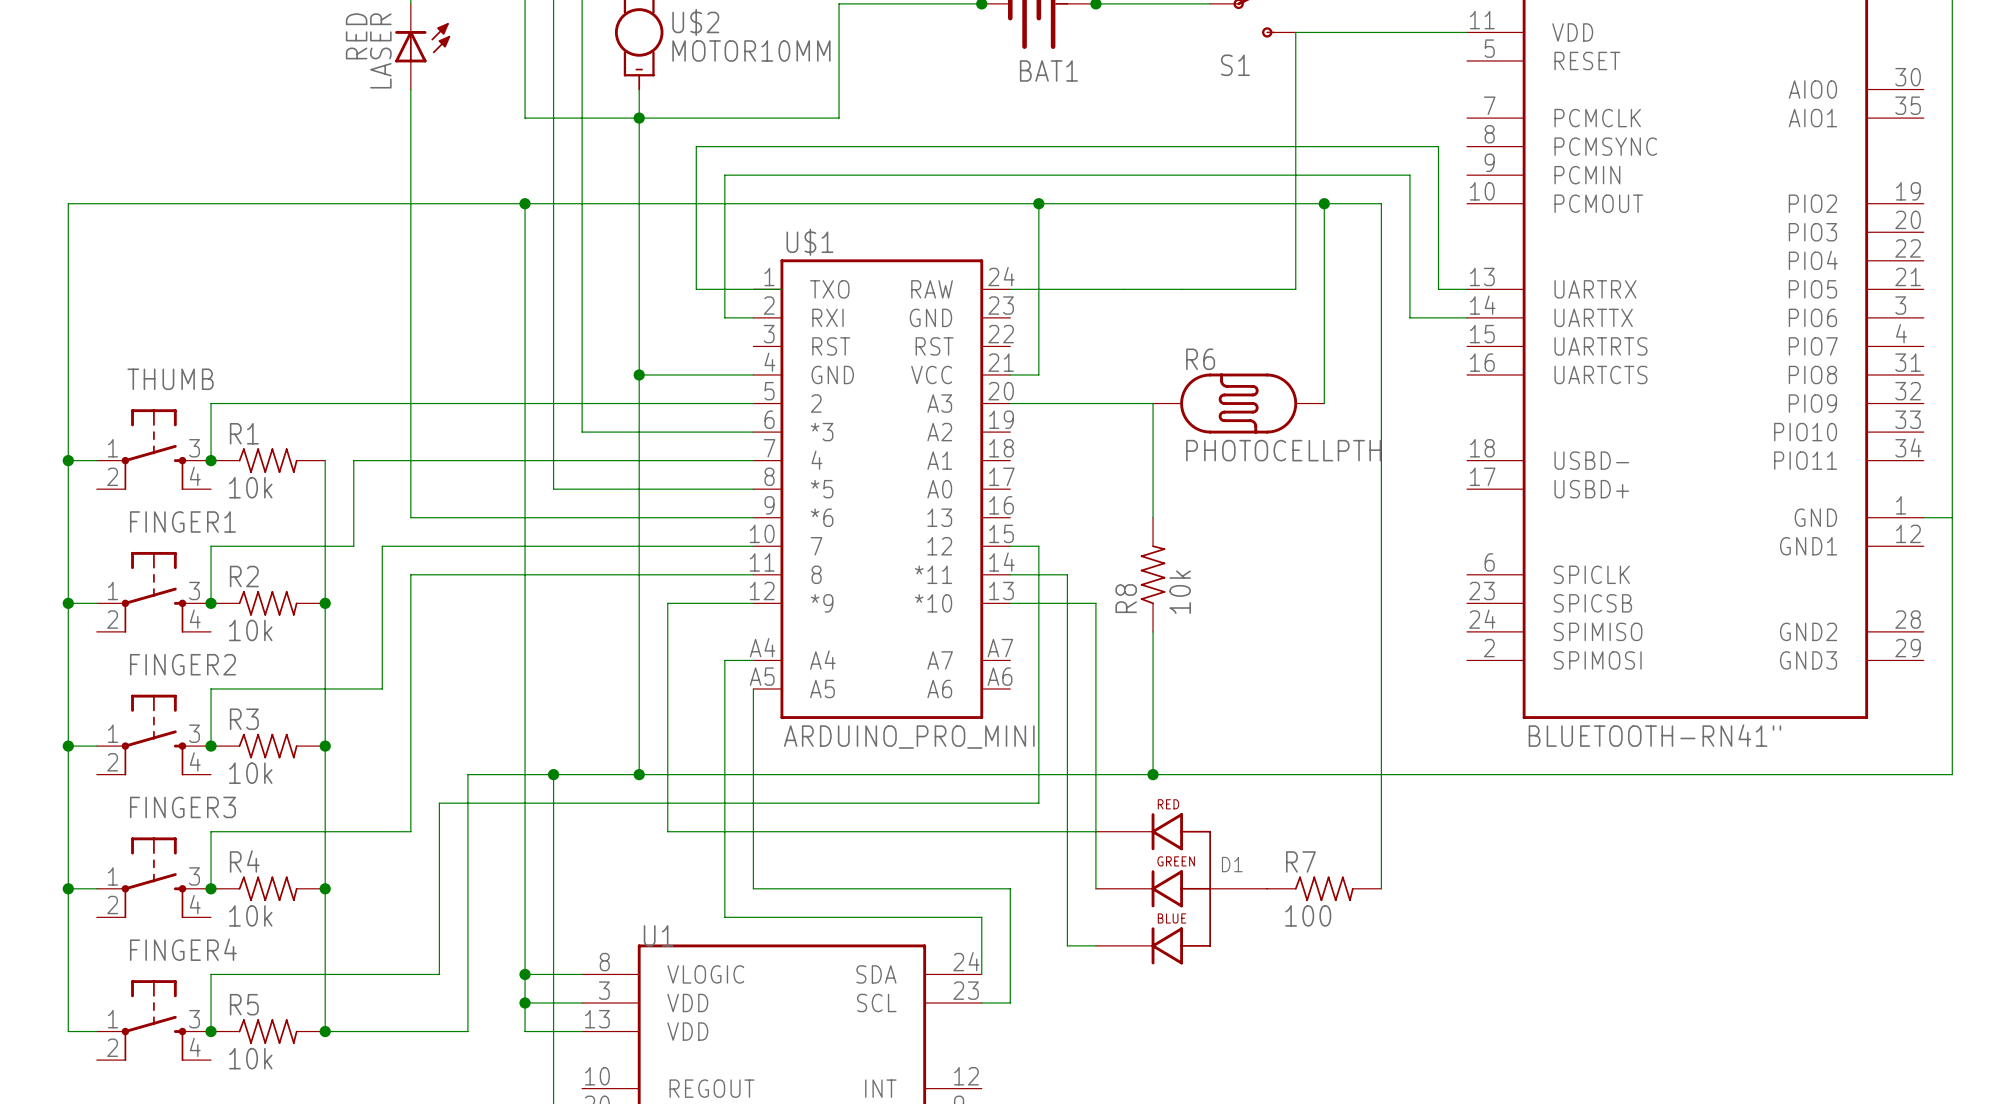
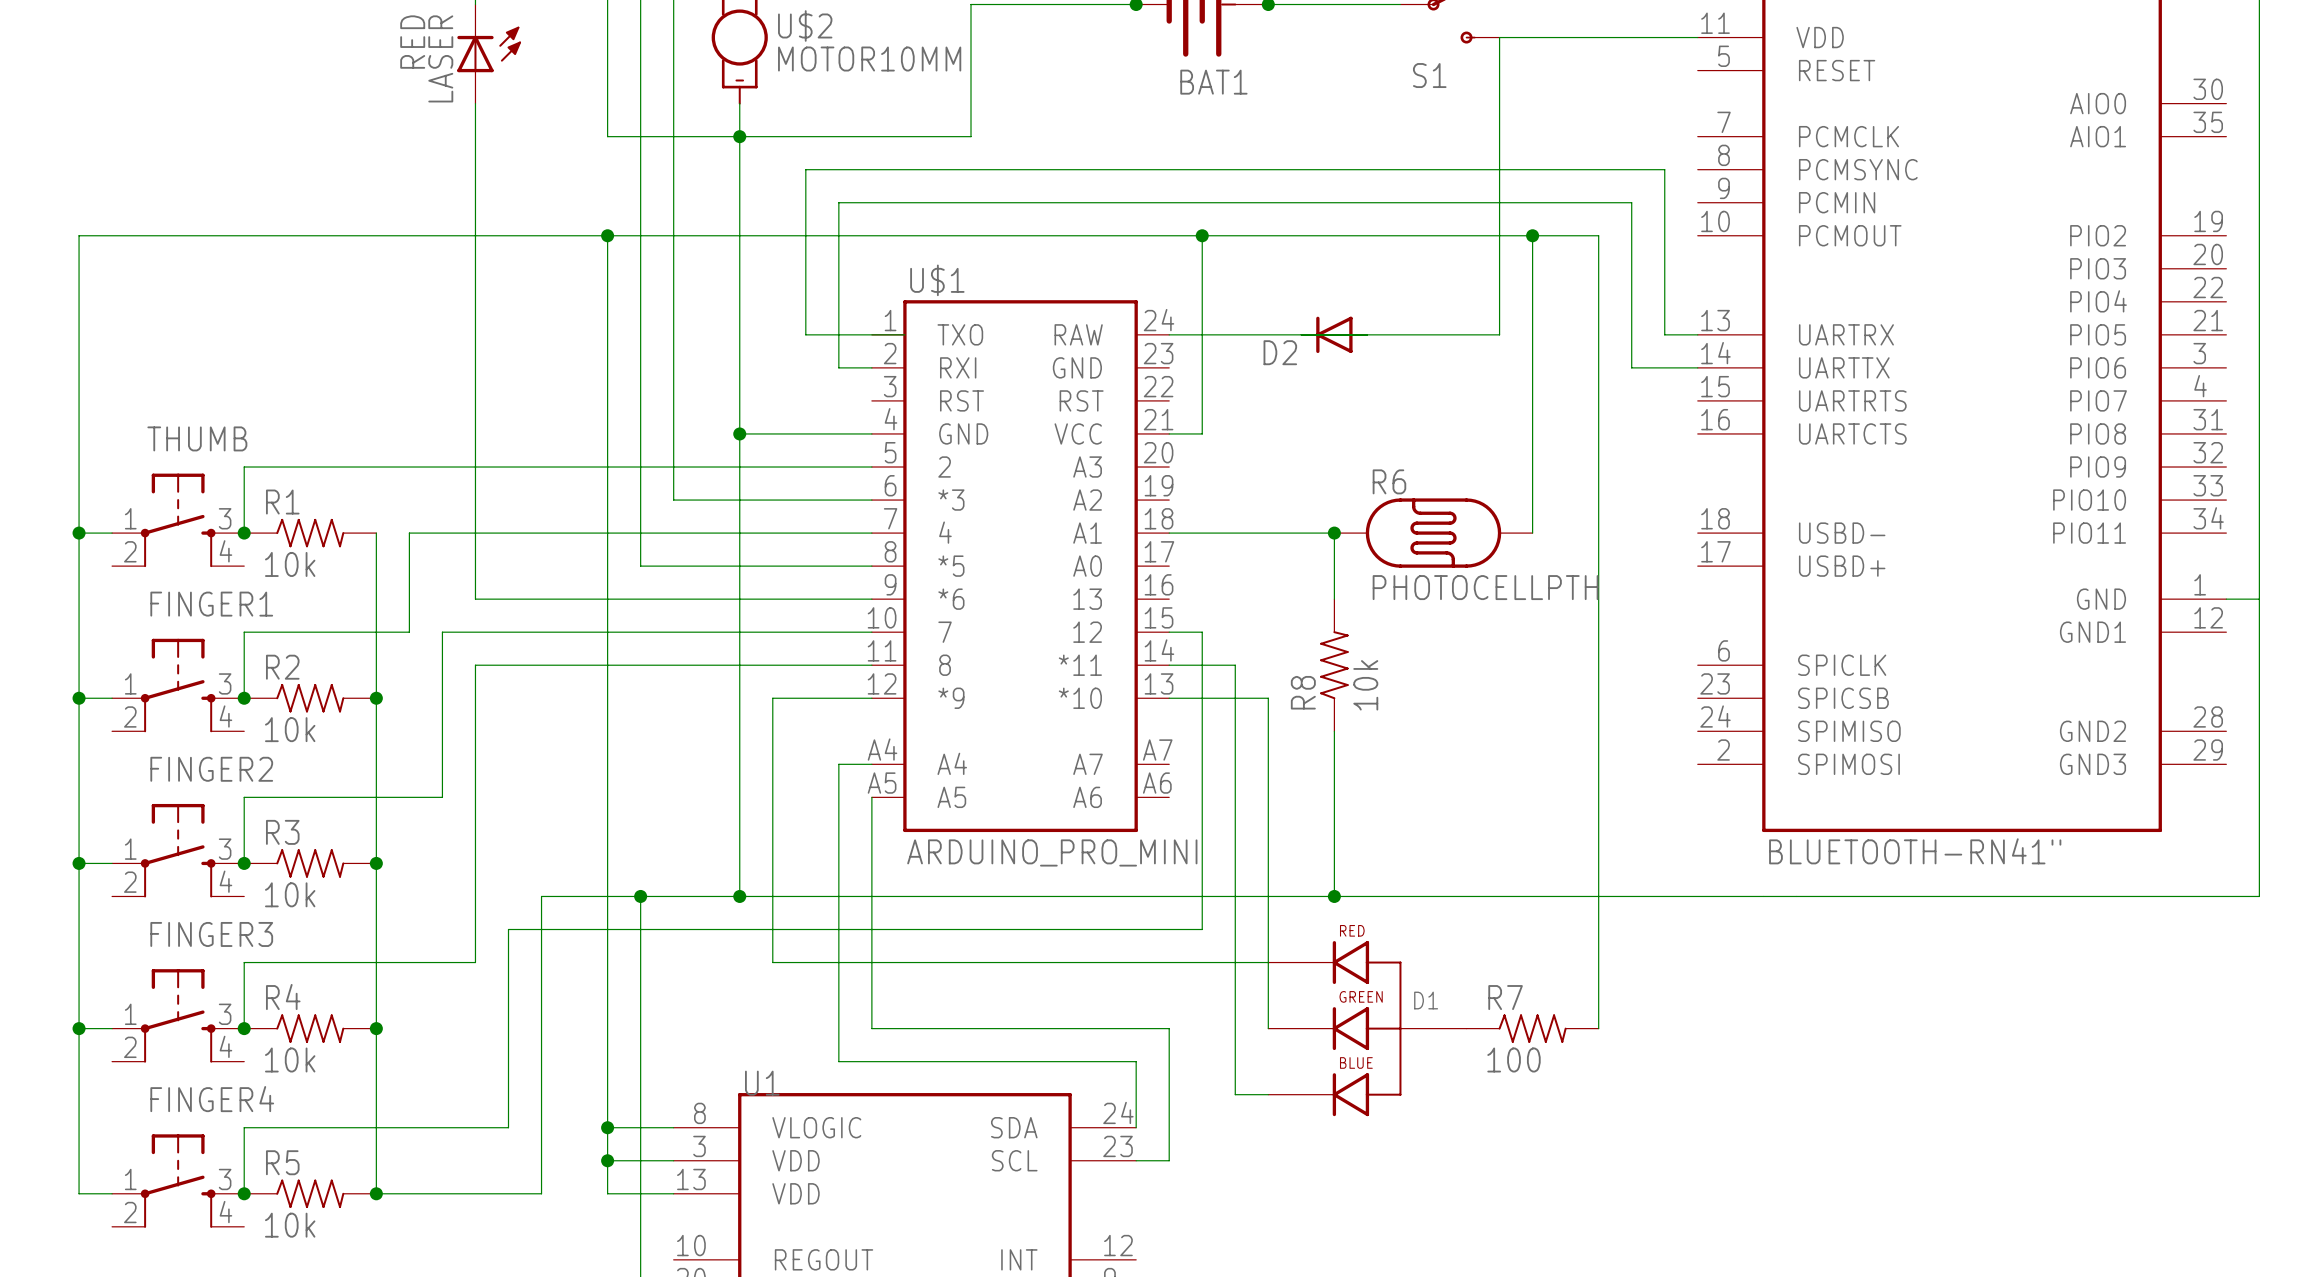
D2: none -> (1334, 334)
wire: (1010, 403) (1153, 403) (1153, 460) -> (1169, 533) (1334, 533)
R6 position: (1238, 403) -> (1433, 533)
wire: none -> (1532, 467) (1532, 533)
junction: none -> (1334, 533)

